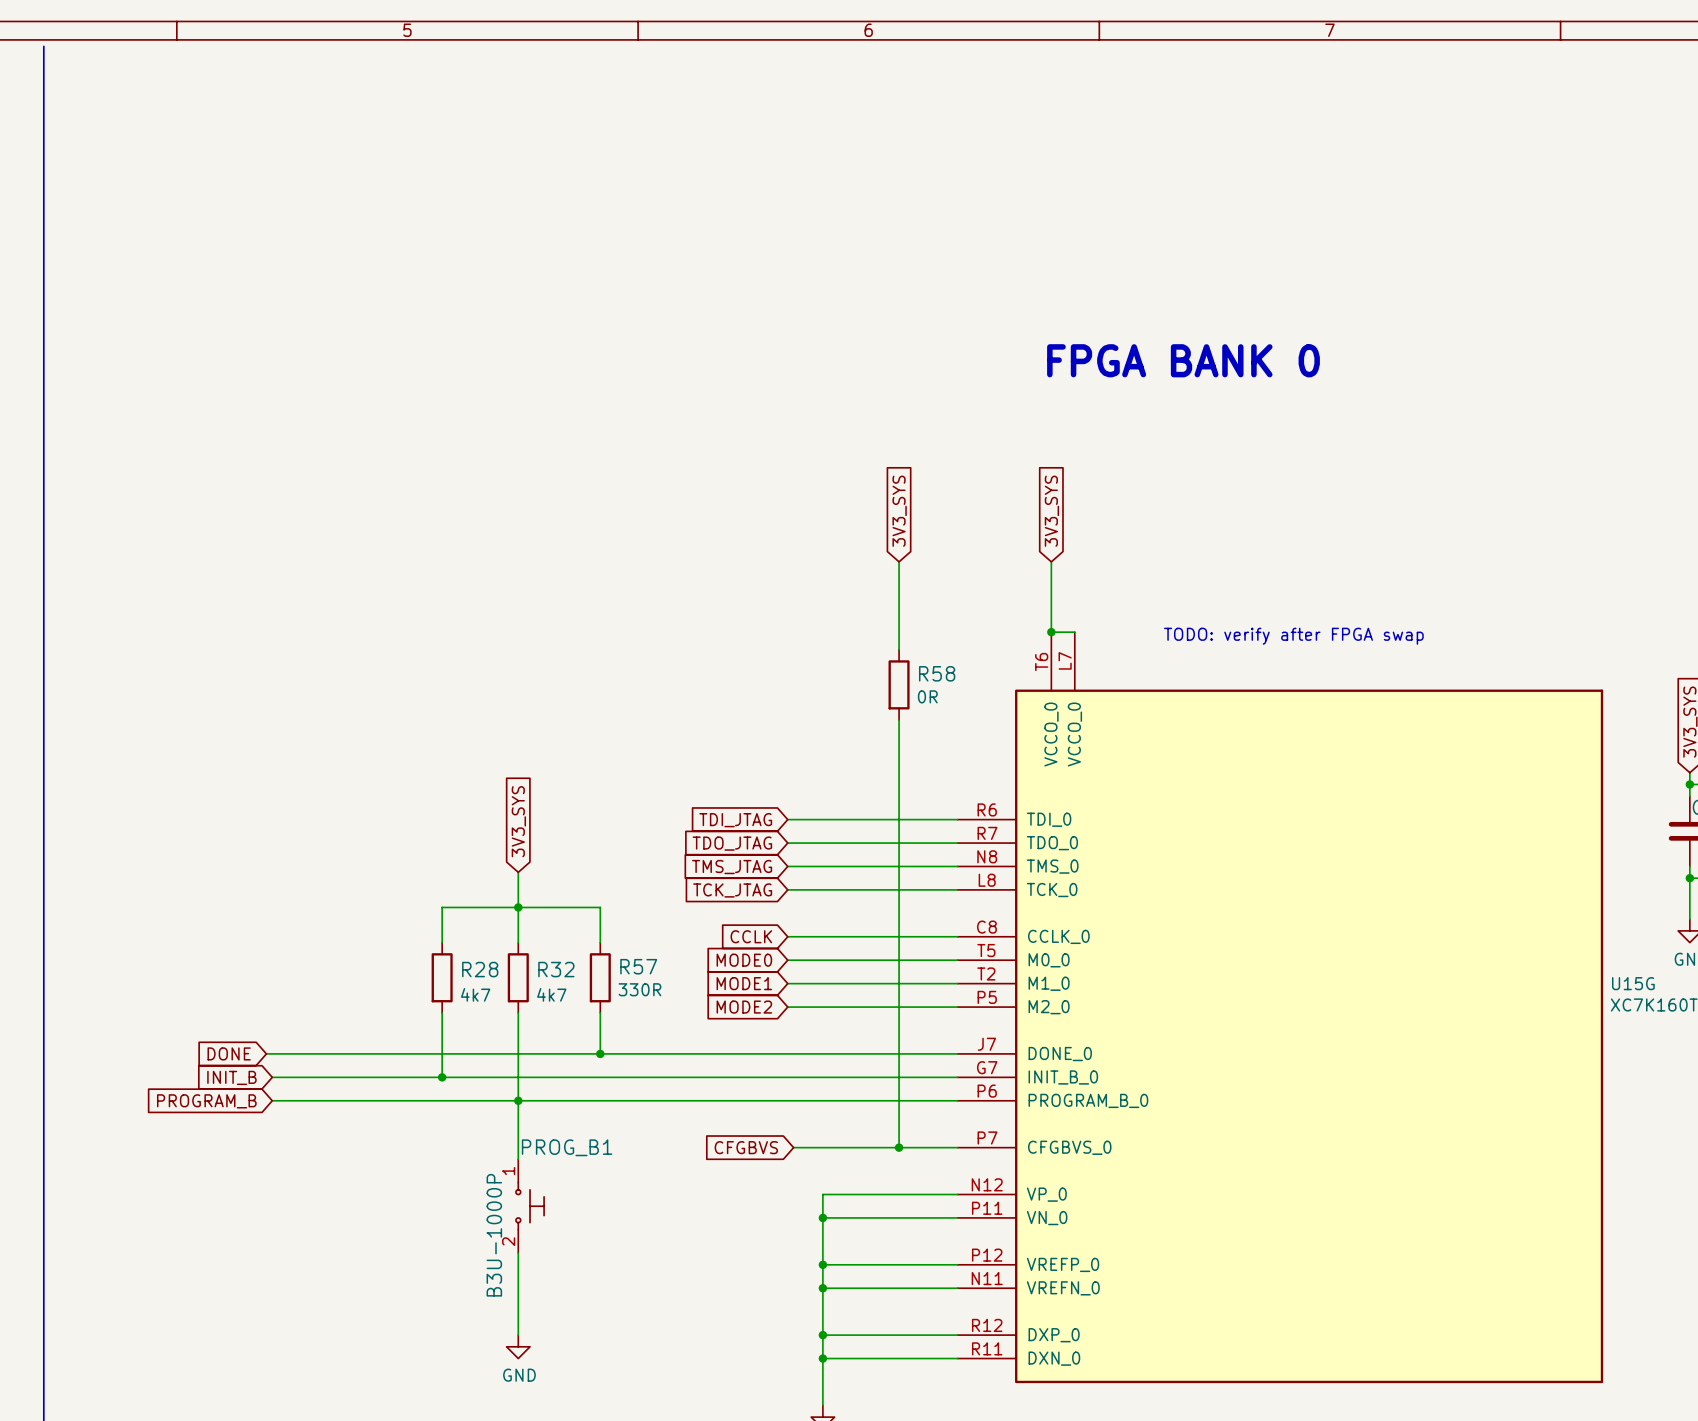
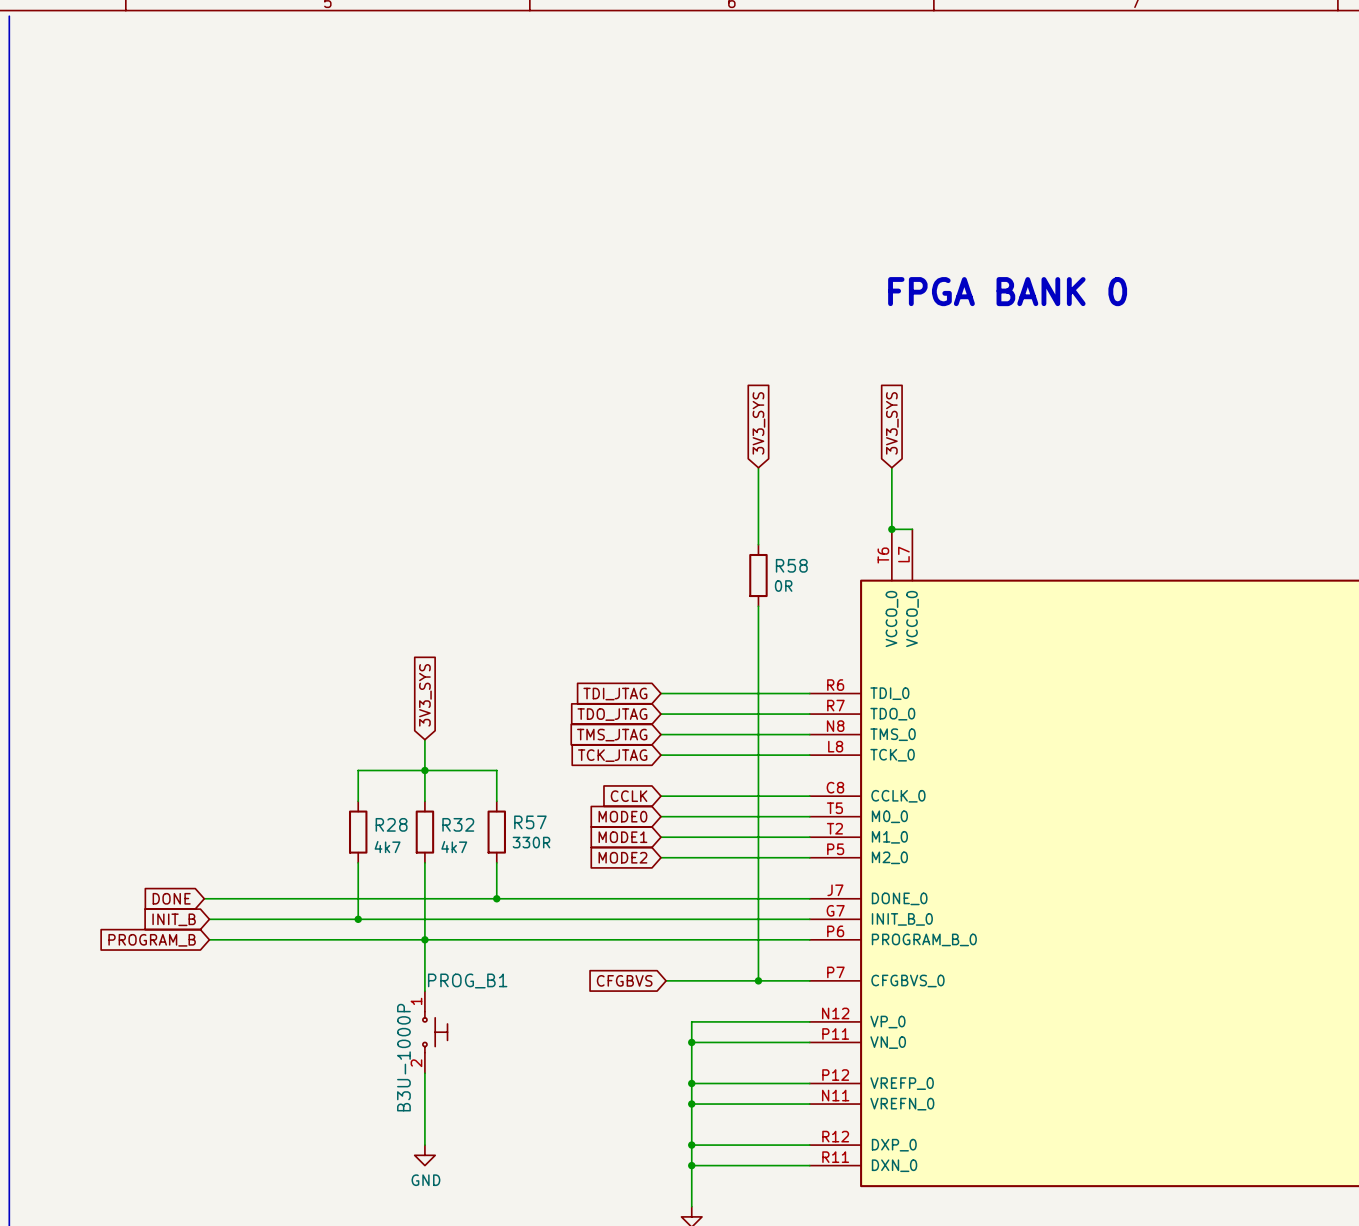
text: TODO: verify after FPGA swap (1293, 636) -> none

